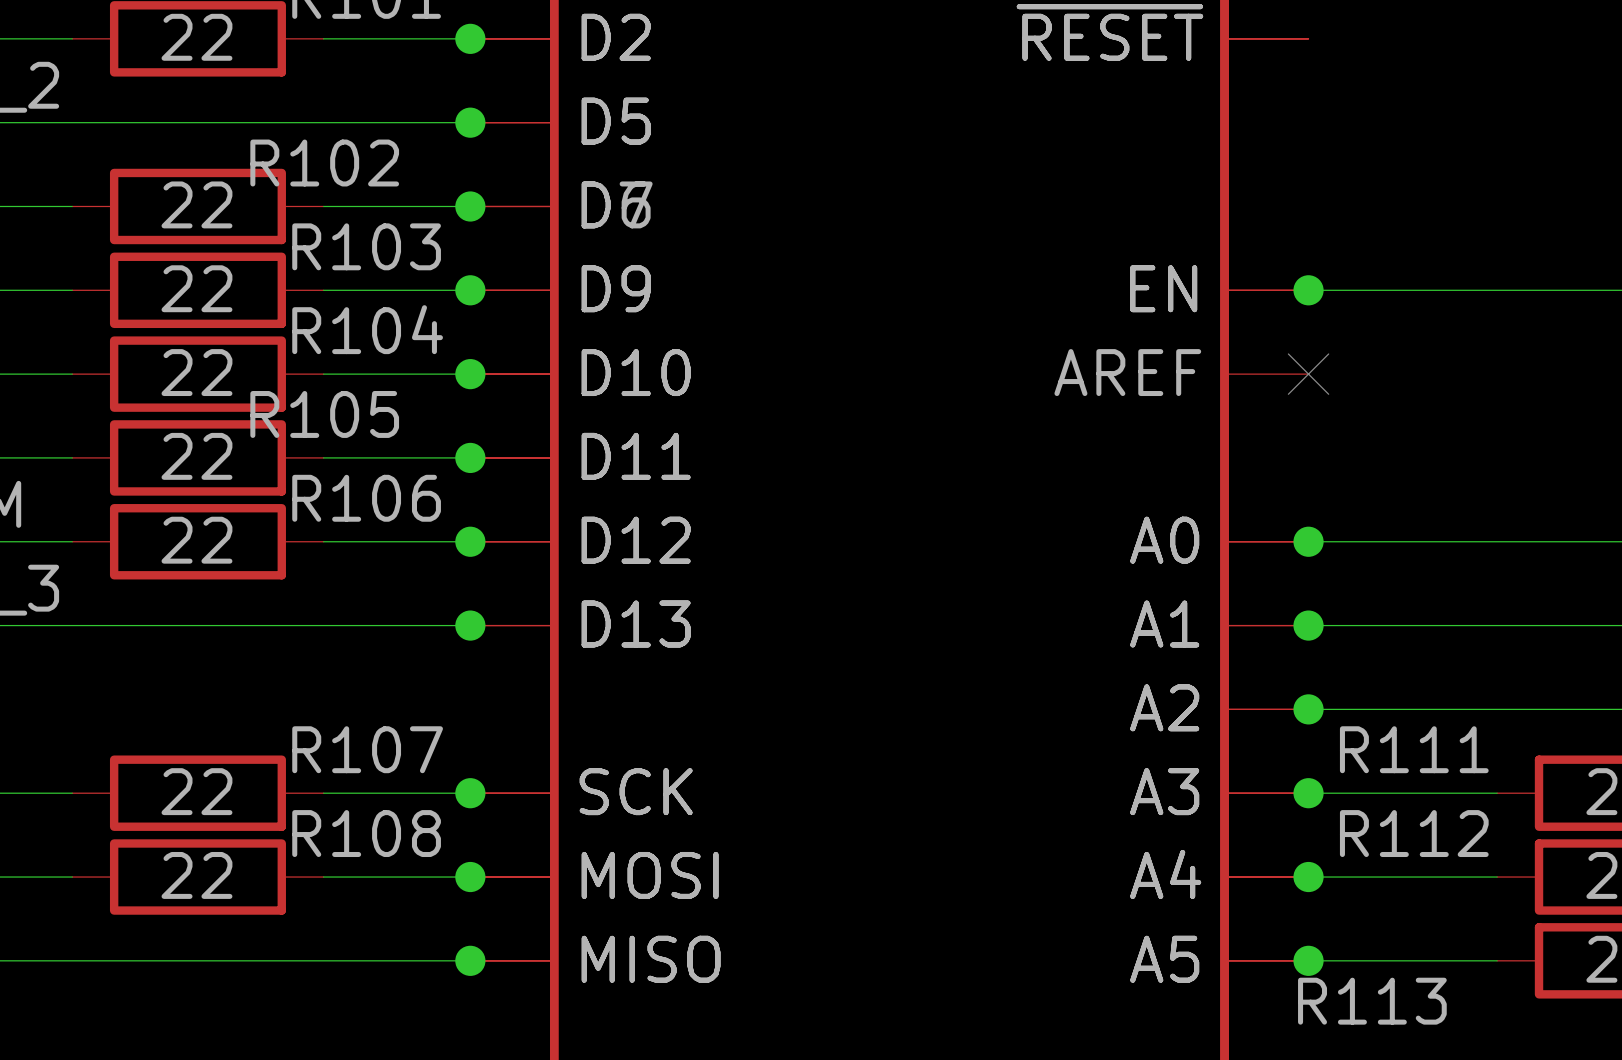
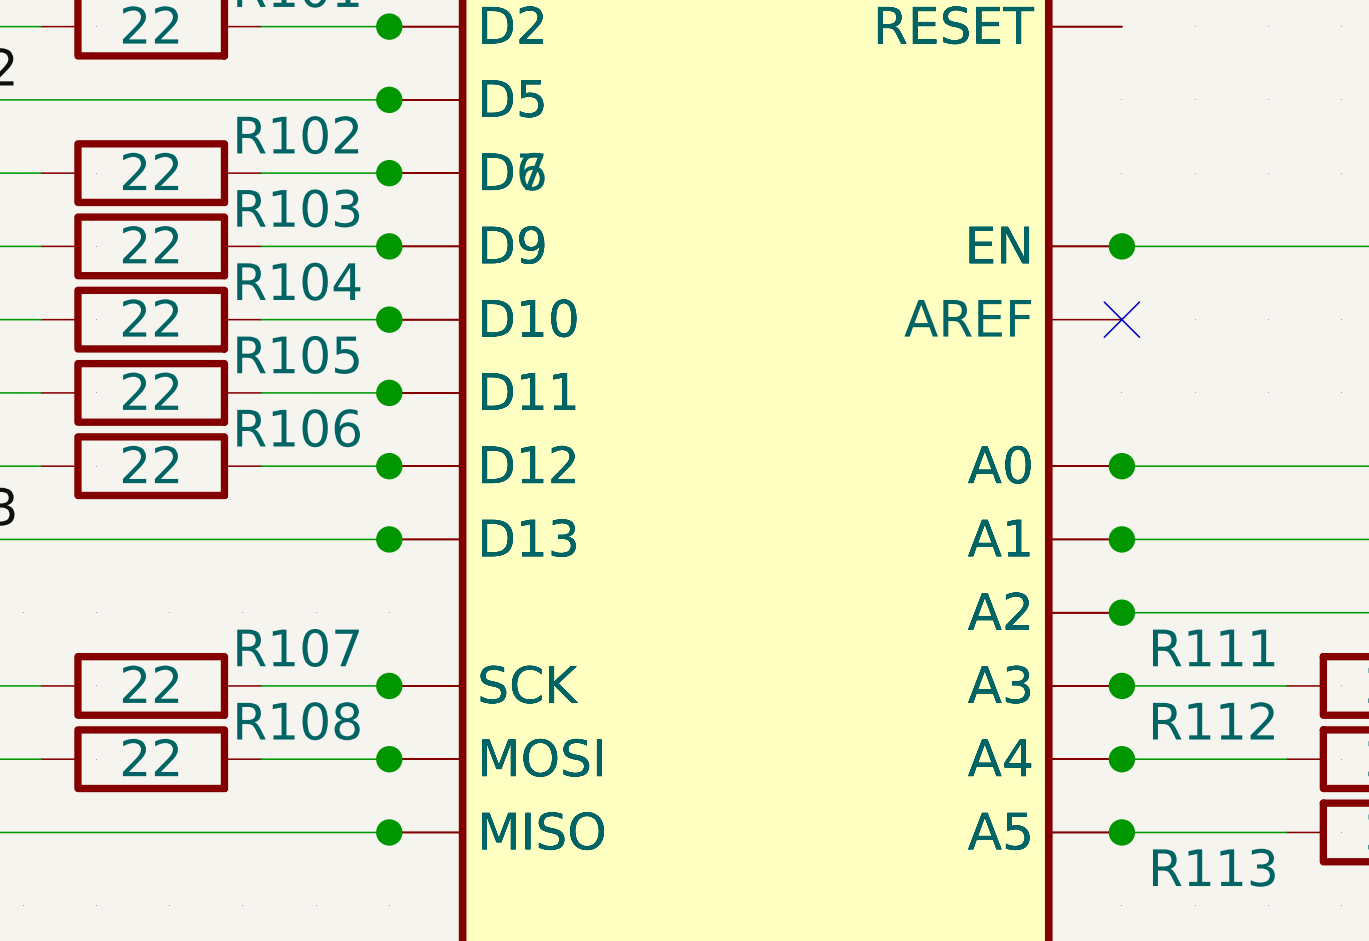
R102 name position: R102 (324, 163) -> R102 (297, 135)
R105 name position: R105 (324, 414) -> R105 (298, 354)
R113 name position: R113 (1372, 1001) -> R113 (1213, 867)

